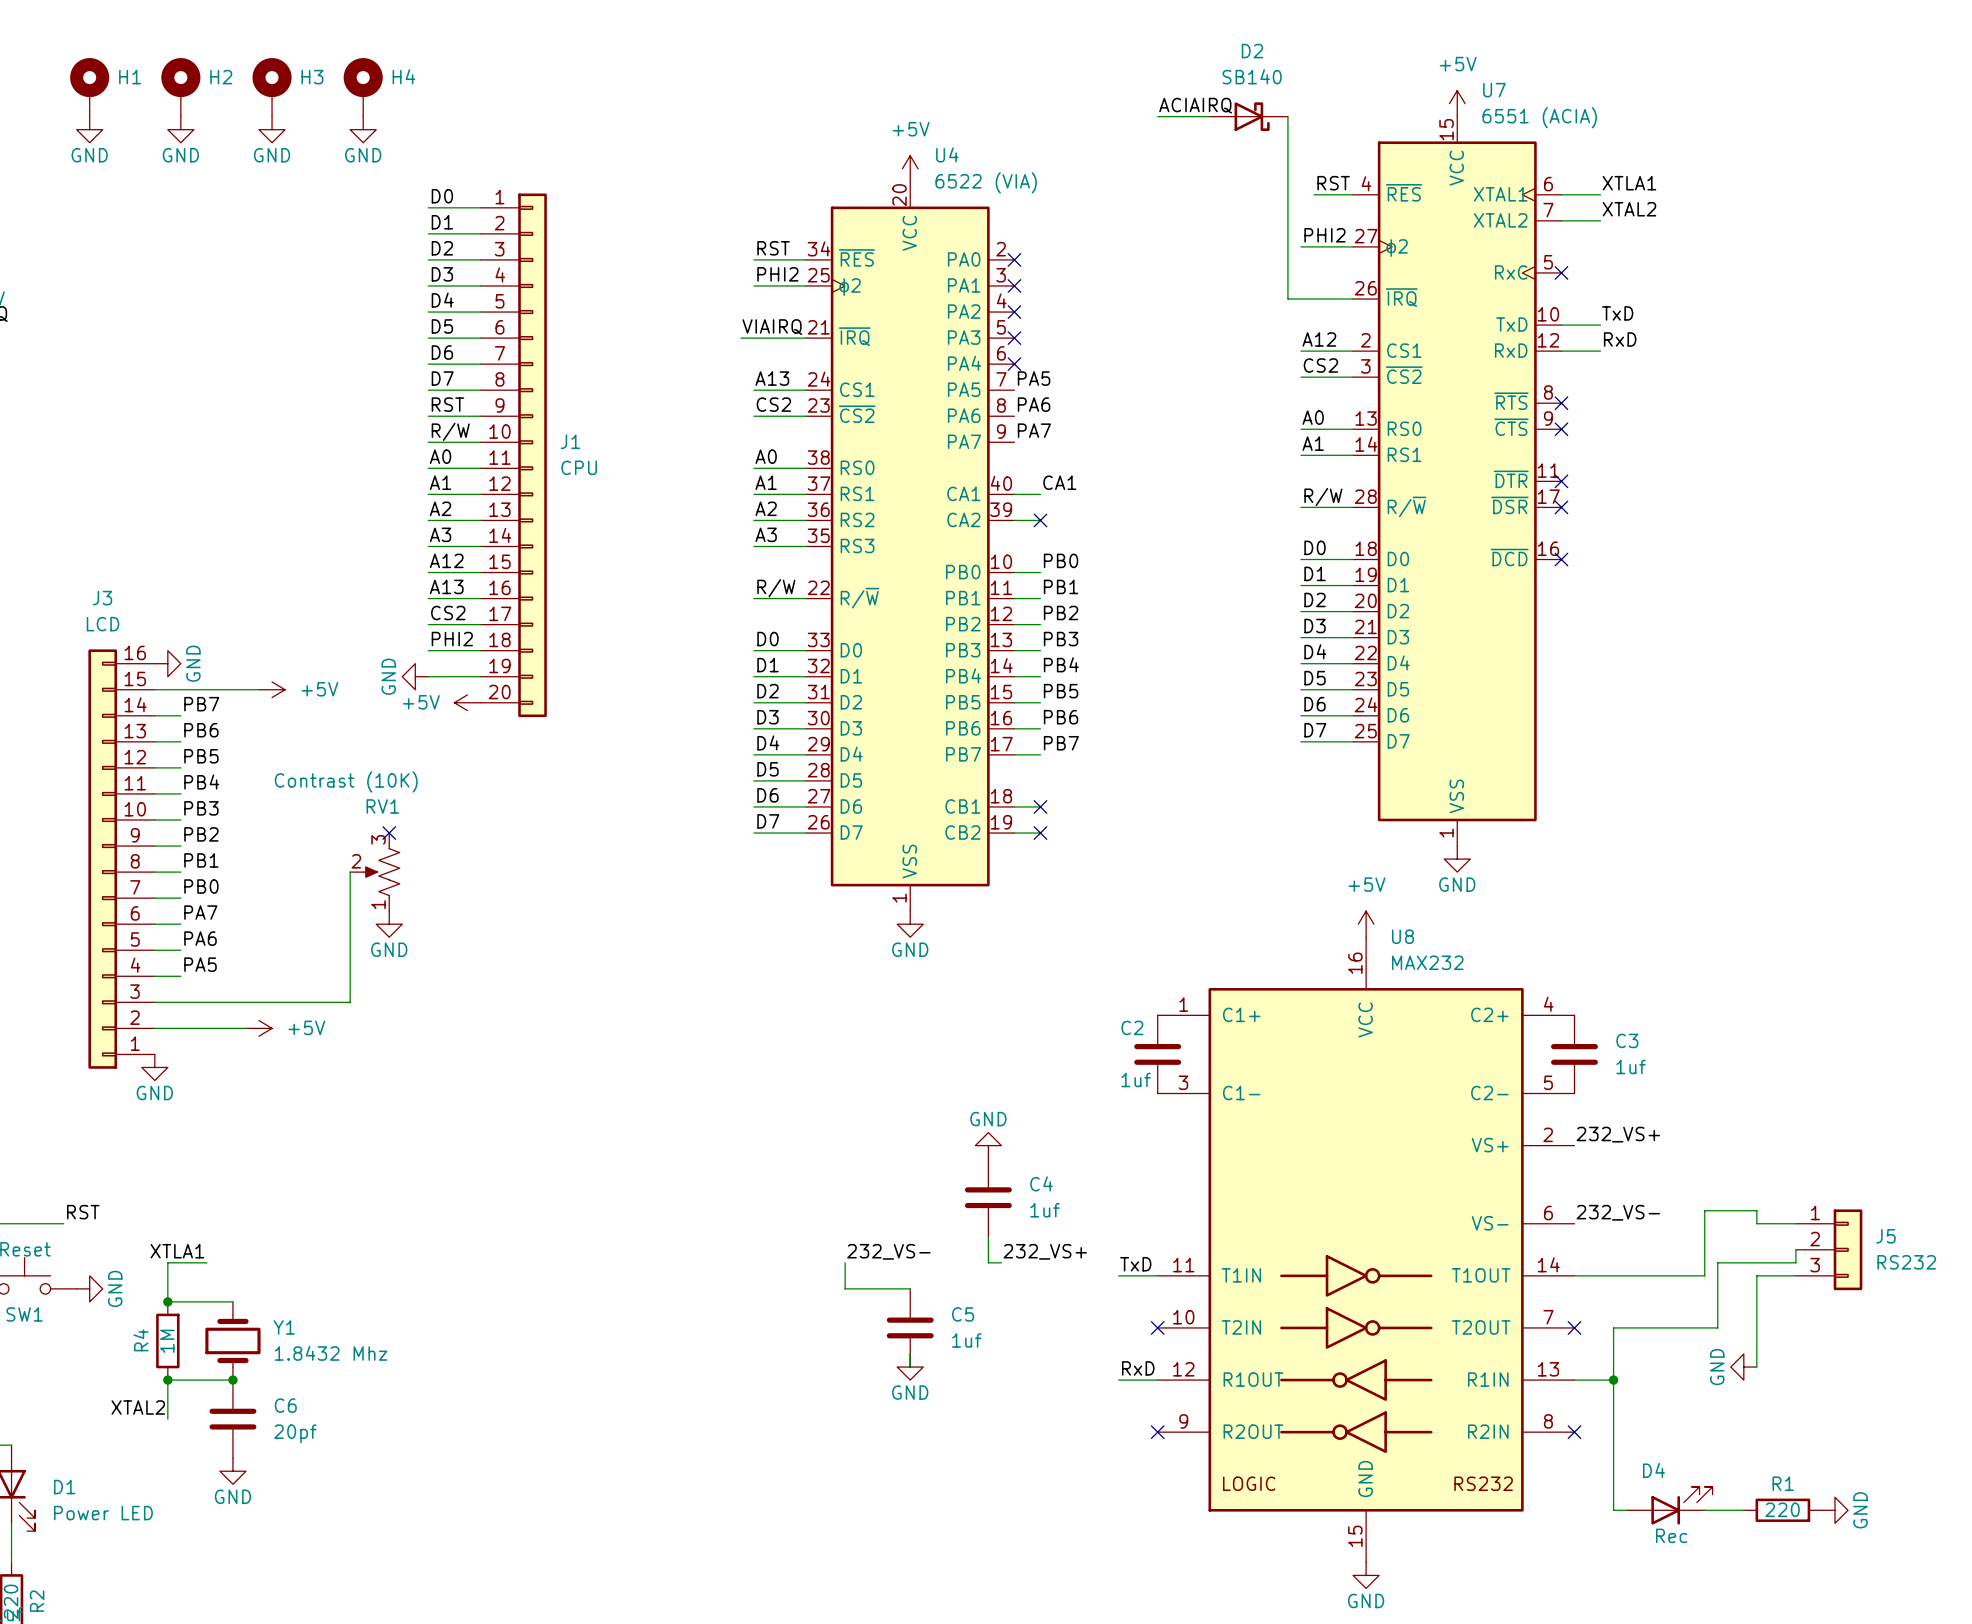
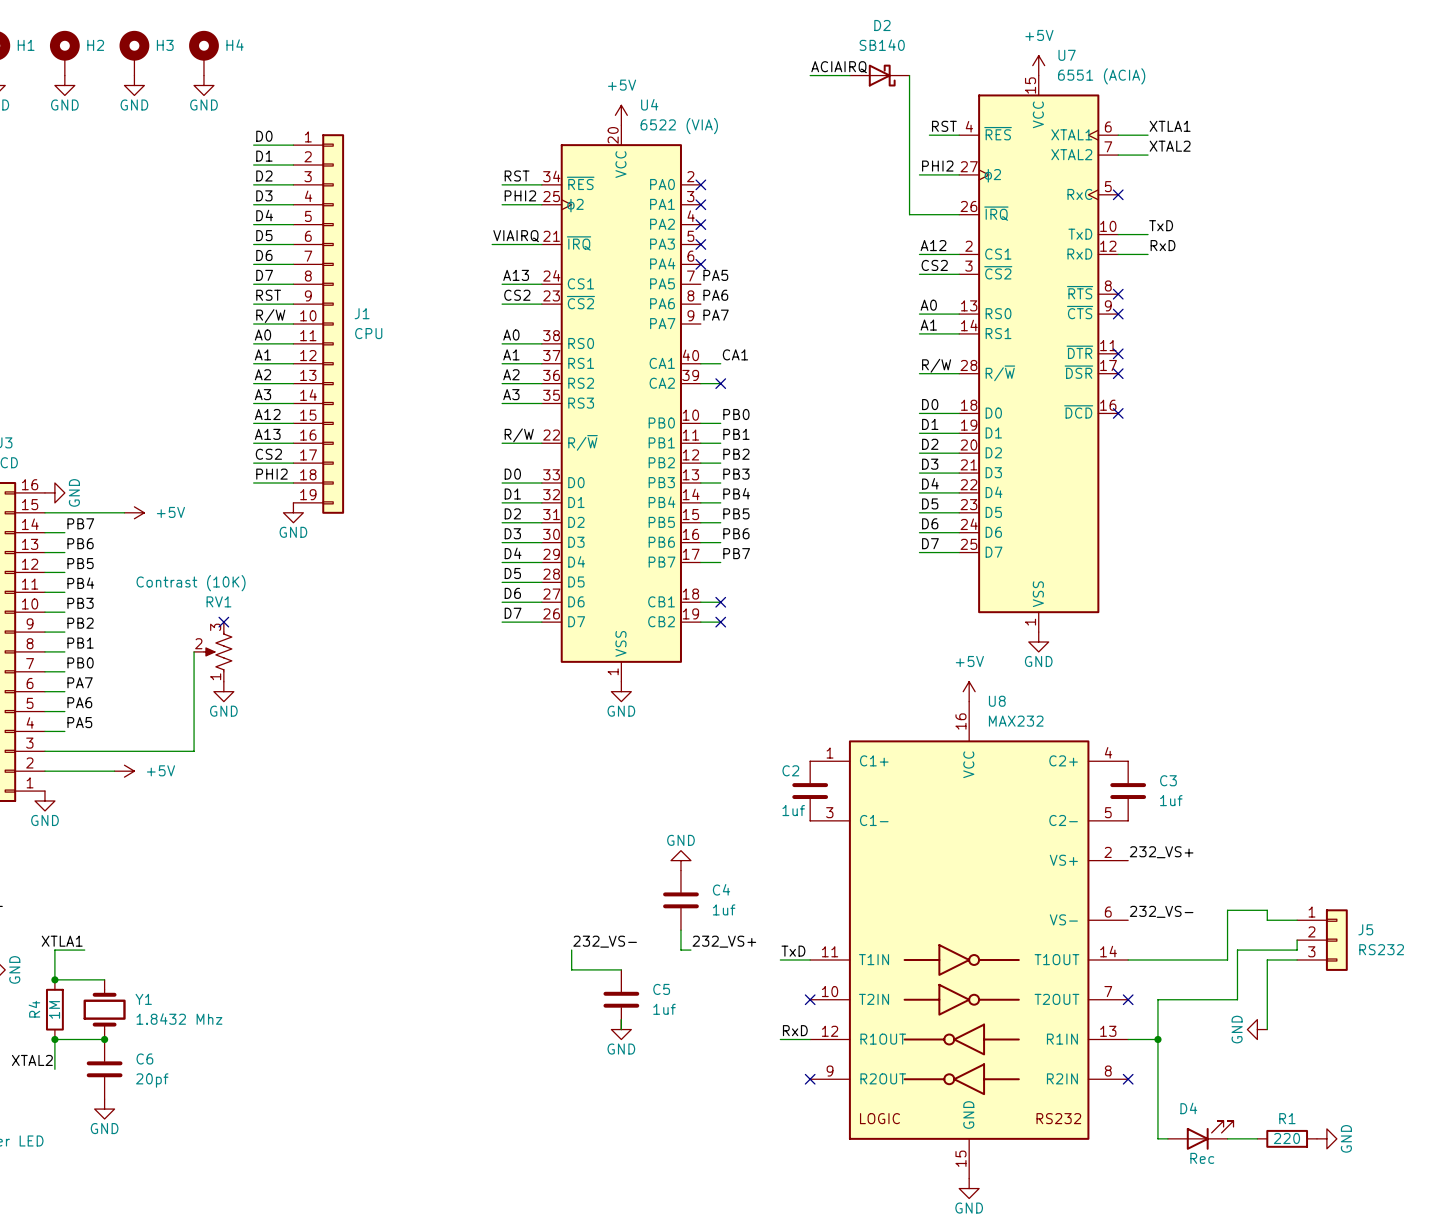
J1 symbol: [480, 193, 547, 718] -> [293, 134, 345, 514]
power symbol rotation: 0° (415, 676) -> 90° counterclockwise (293, 512)
power symbol position: GND (415, 676) -> GND (293, 512)
wire: (428, 676) (480, 676) -> none
power symbol: +5V (467, 702) -> none

